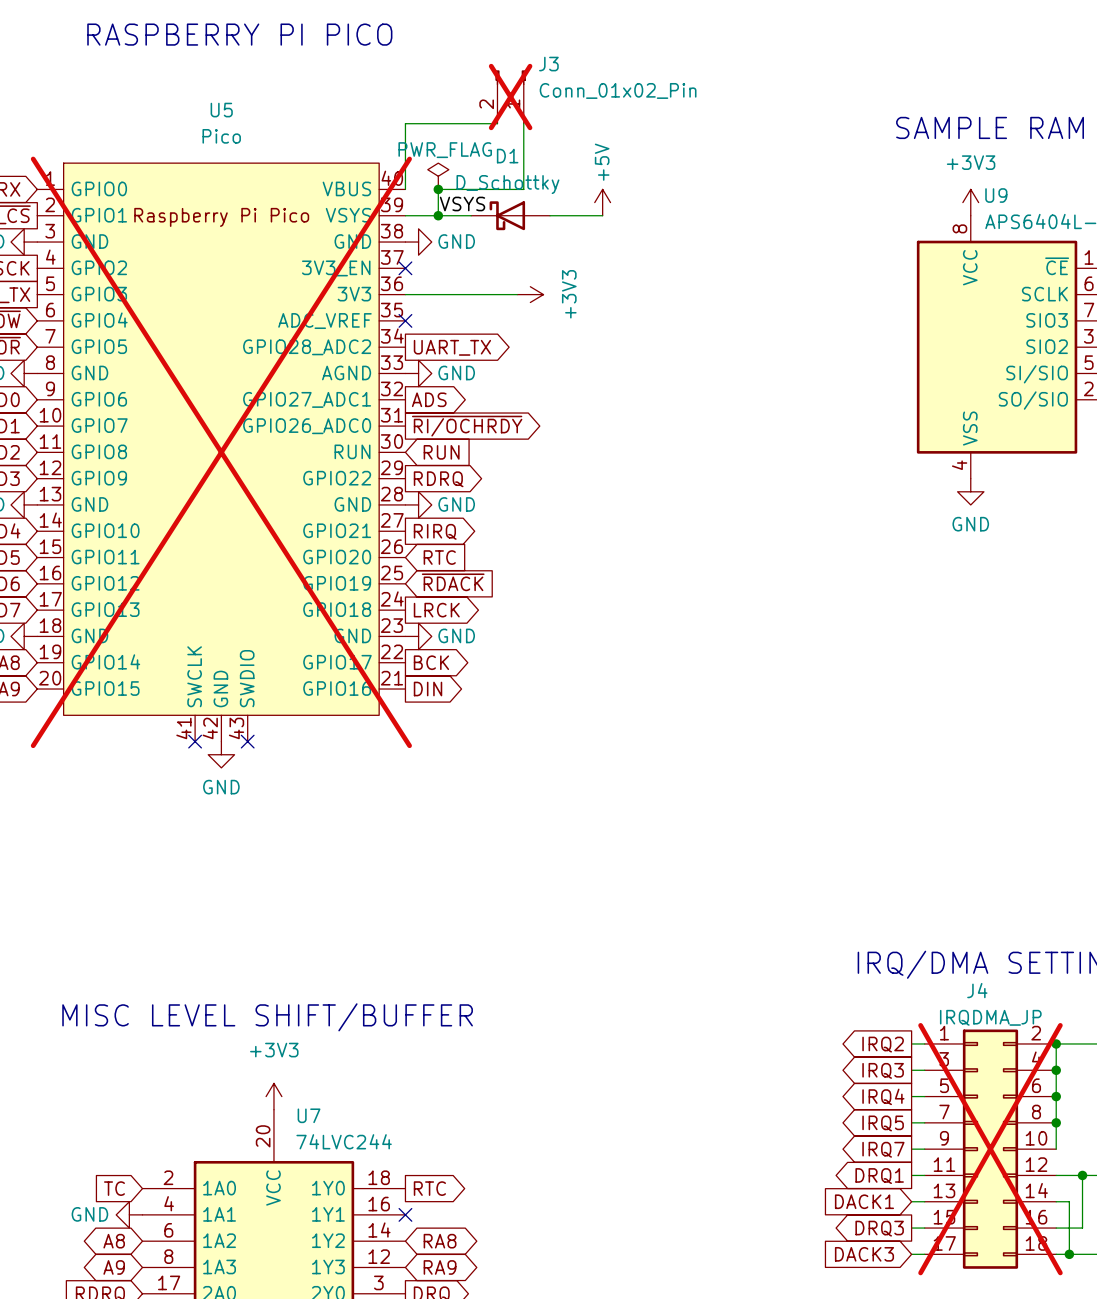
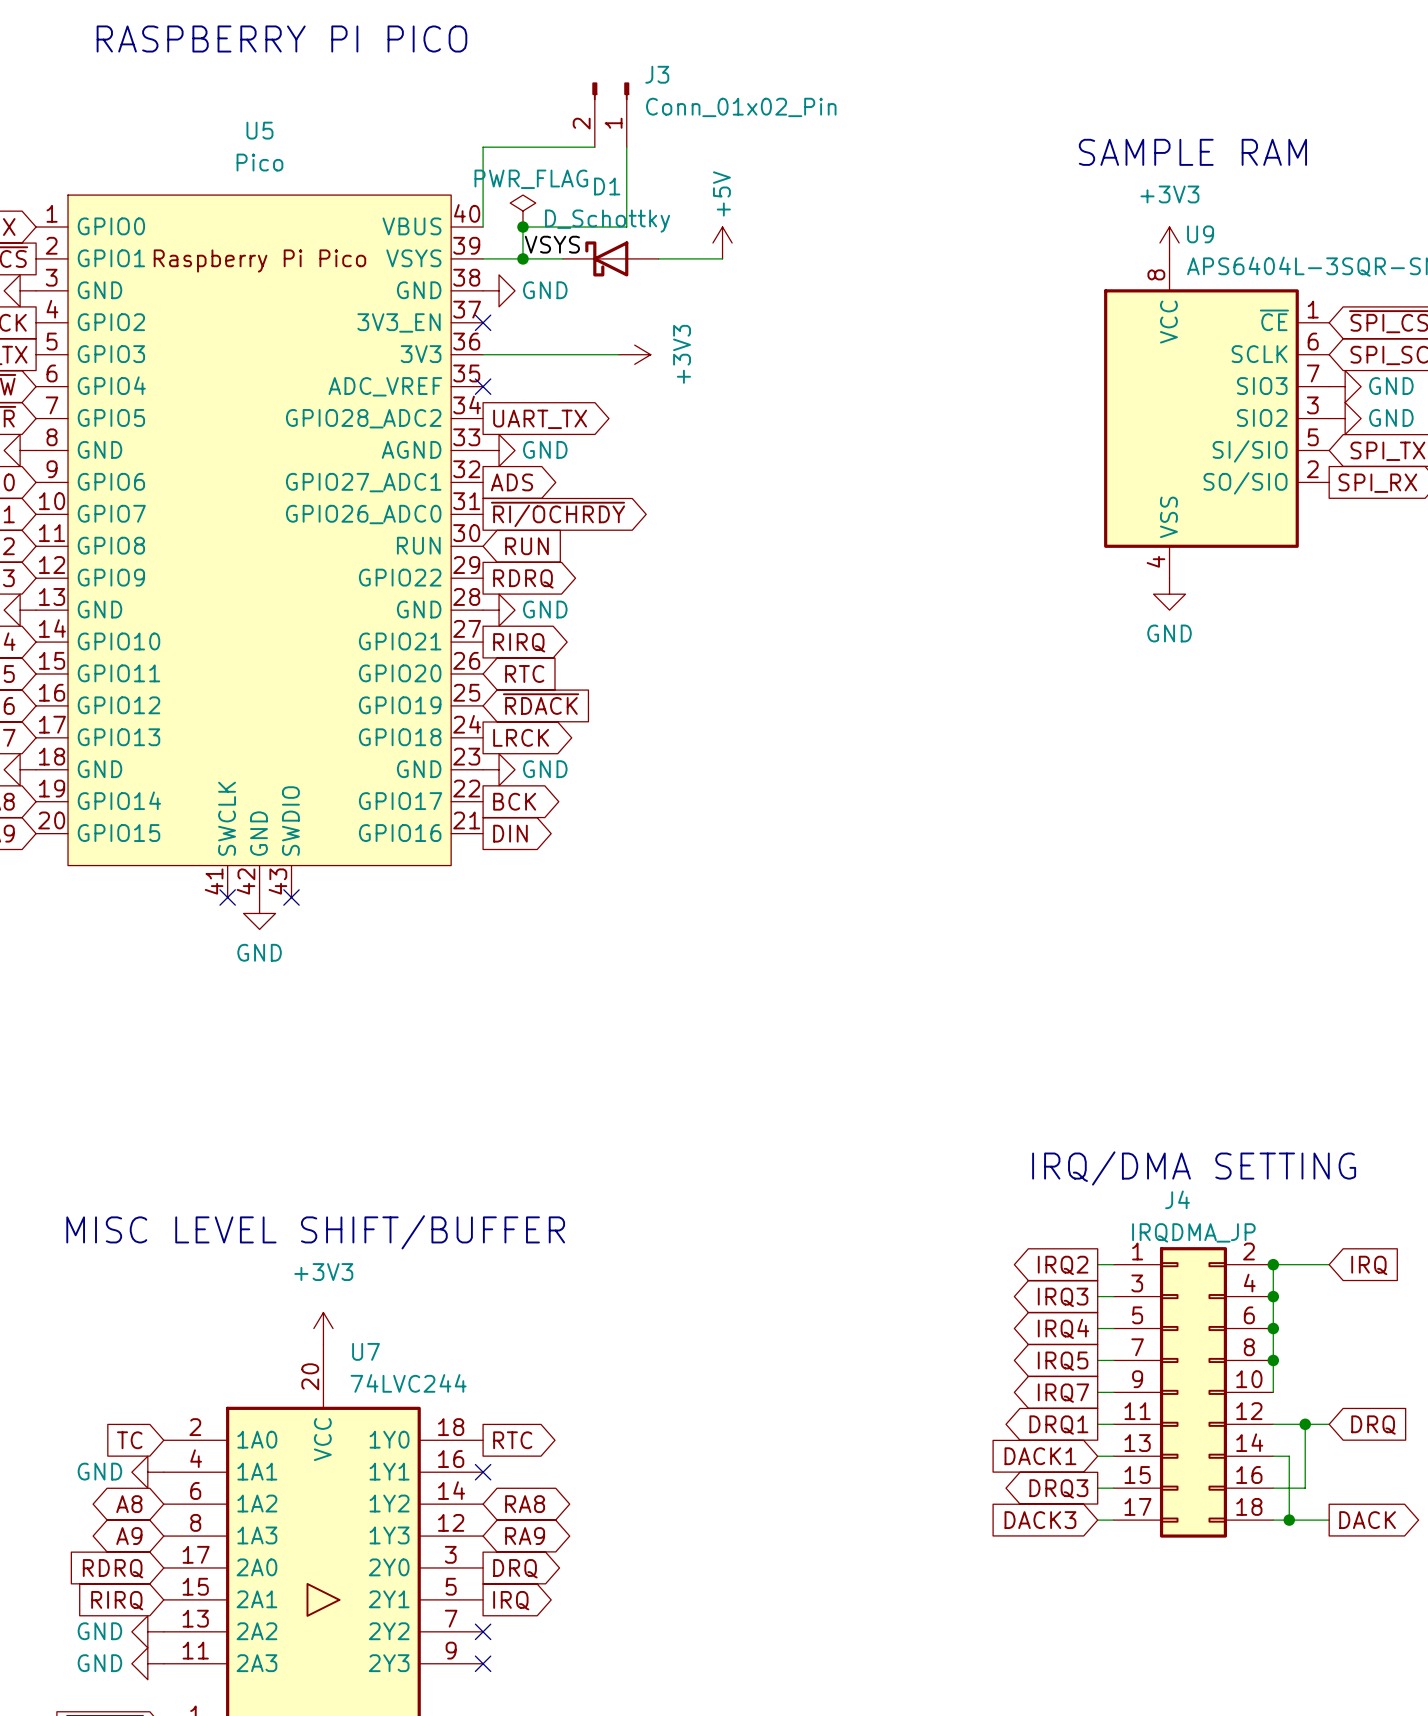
J3 do-not-place cross: (510, 97) -> none
U5 do-not-place cross: (221, 452) -> none
J4 do-not-place cross: (990, 1149) -> none

